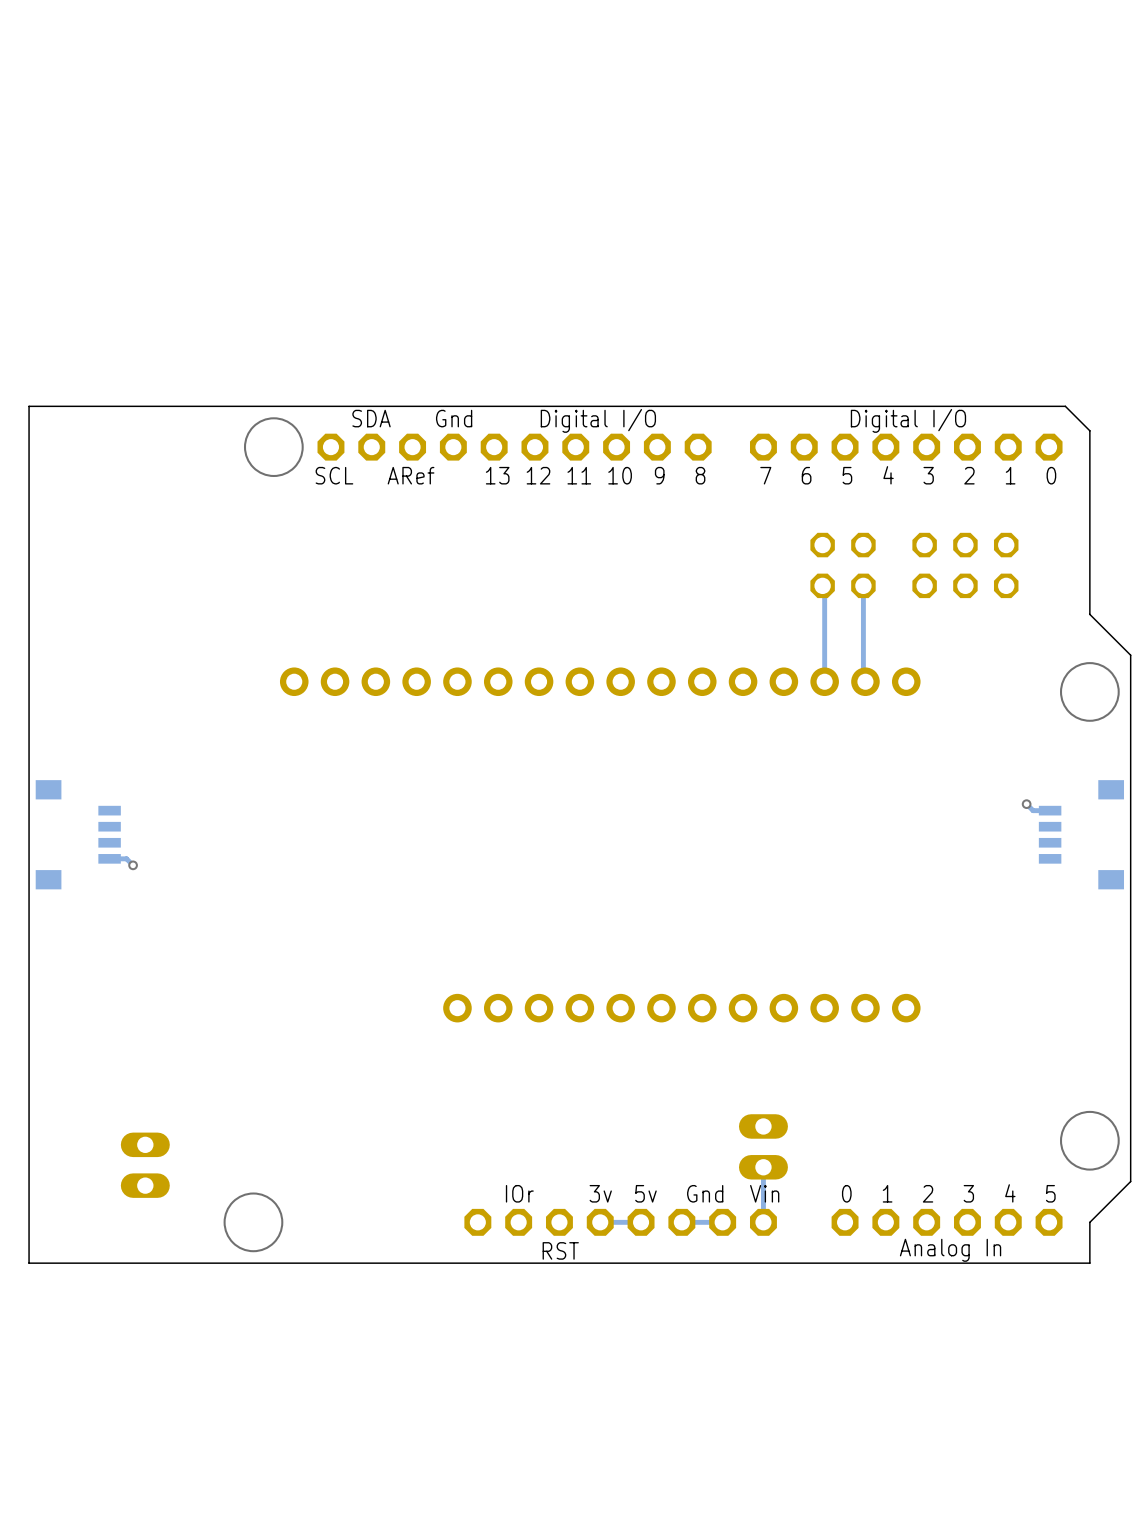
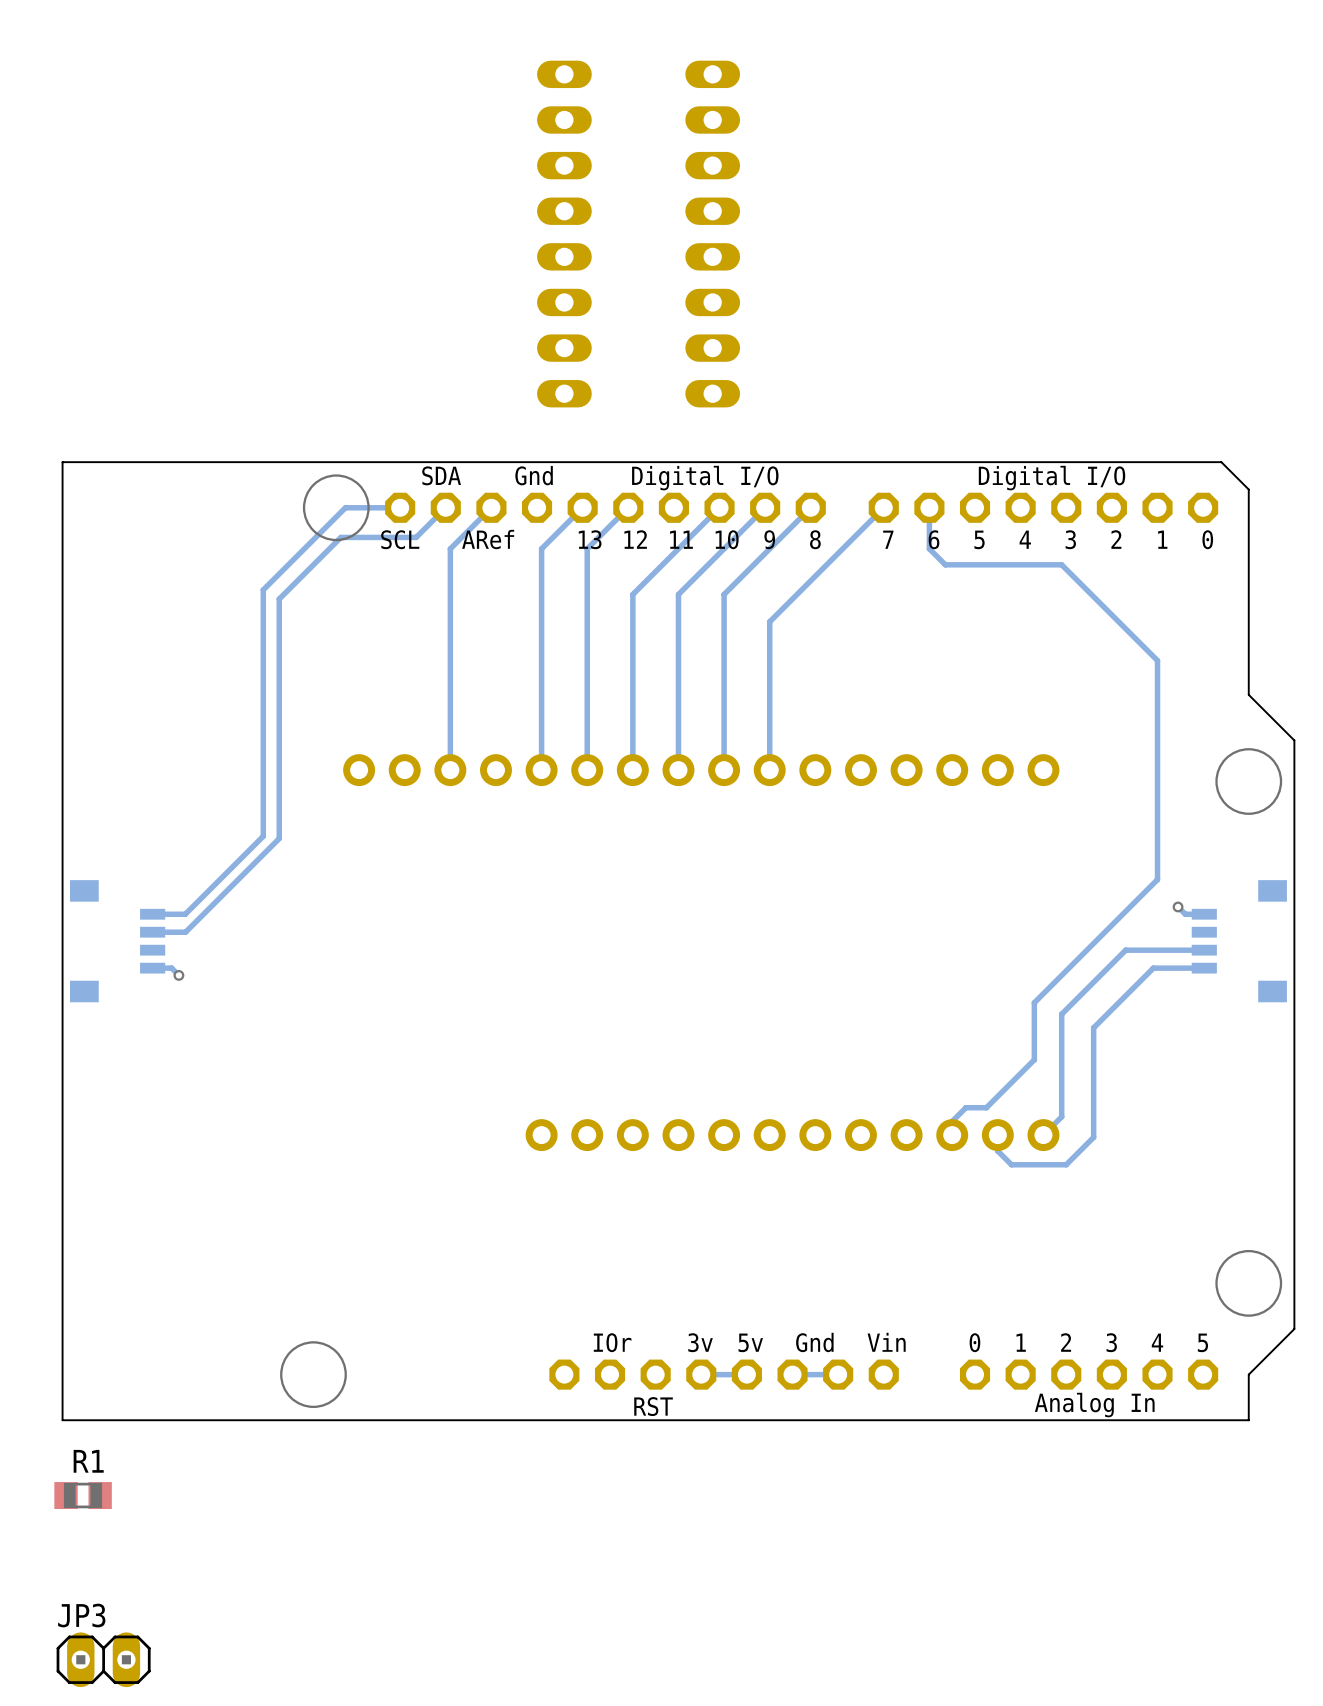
part: none -> (564, 234)
part: none -> (712, 234)
bottom track: none -> (400, 507) (345, 507) (263, 589) (263, 836) (185, 914) (152, 914)
bottom track: none -> (445, 507) (416, 537) (340, 537) (279, 599) (279, 838) (185, 932) (152, 932)
bottom track: none -> (491, 507) (450, 548) (450, 770)
bottom track: none -> (582, 507) (541, 548) (541, 770)
bottom track: none -> (628, 507) (587, 548) (587, 770)
bottom track: none -> (719, 507) (632, 594) (632, 770)
bottom track: none -> (765, 507) (678, 594) (678, 770)
bottom track: none -> (810, 507) (724, 594) (724, 770)
bottom track: none -> (883, 507) (769, 621) (769, 770)
bottom track: none -> (929, 507) (929, 548) (945, 564) (1061, 564) (1157, 660) (1157, 879) (1034, 1002) (1034, 1059) (986, 1107) (965, 1107) (952, 1121) (952, 1135)
part: (843, 565) -> none
part: (965, 565) -> none
bottom track: (822, 585) (824, 587) (824, 681) -> none
bottom track: (863, 585) (863, 679) (865, 681) -> none
bottom track: none -> (1204, 950) (1125, 950) (1061, 1014) (1061, 1116) (1043, 1135)
bottom track: none -> (1204, 968) (1153, 968) (1093, 1027) (1093, 1137) (1066, 1164) (1011, 1164) (997, 1151) (997, 1135)
part: (763, 1146) -> none
JP3 side: bottom (145, 1165) -> top (103, 1659)
bottom track: (763, 1167) (763, 1222) -> none
R1: none -> (83, 1495)

